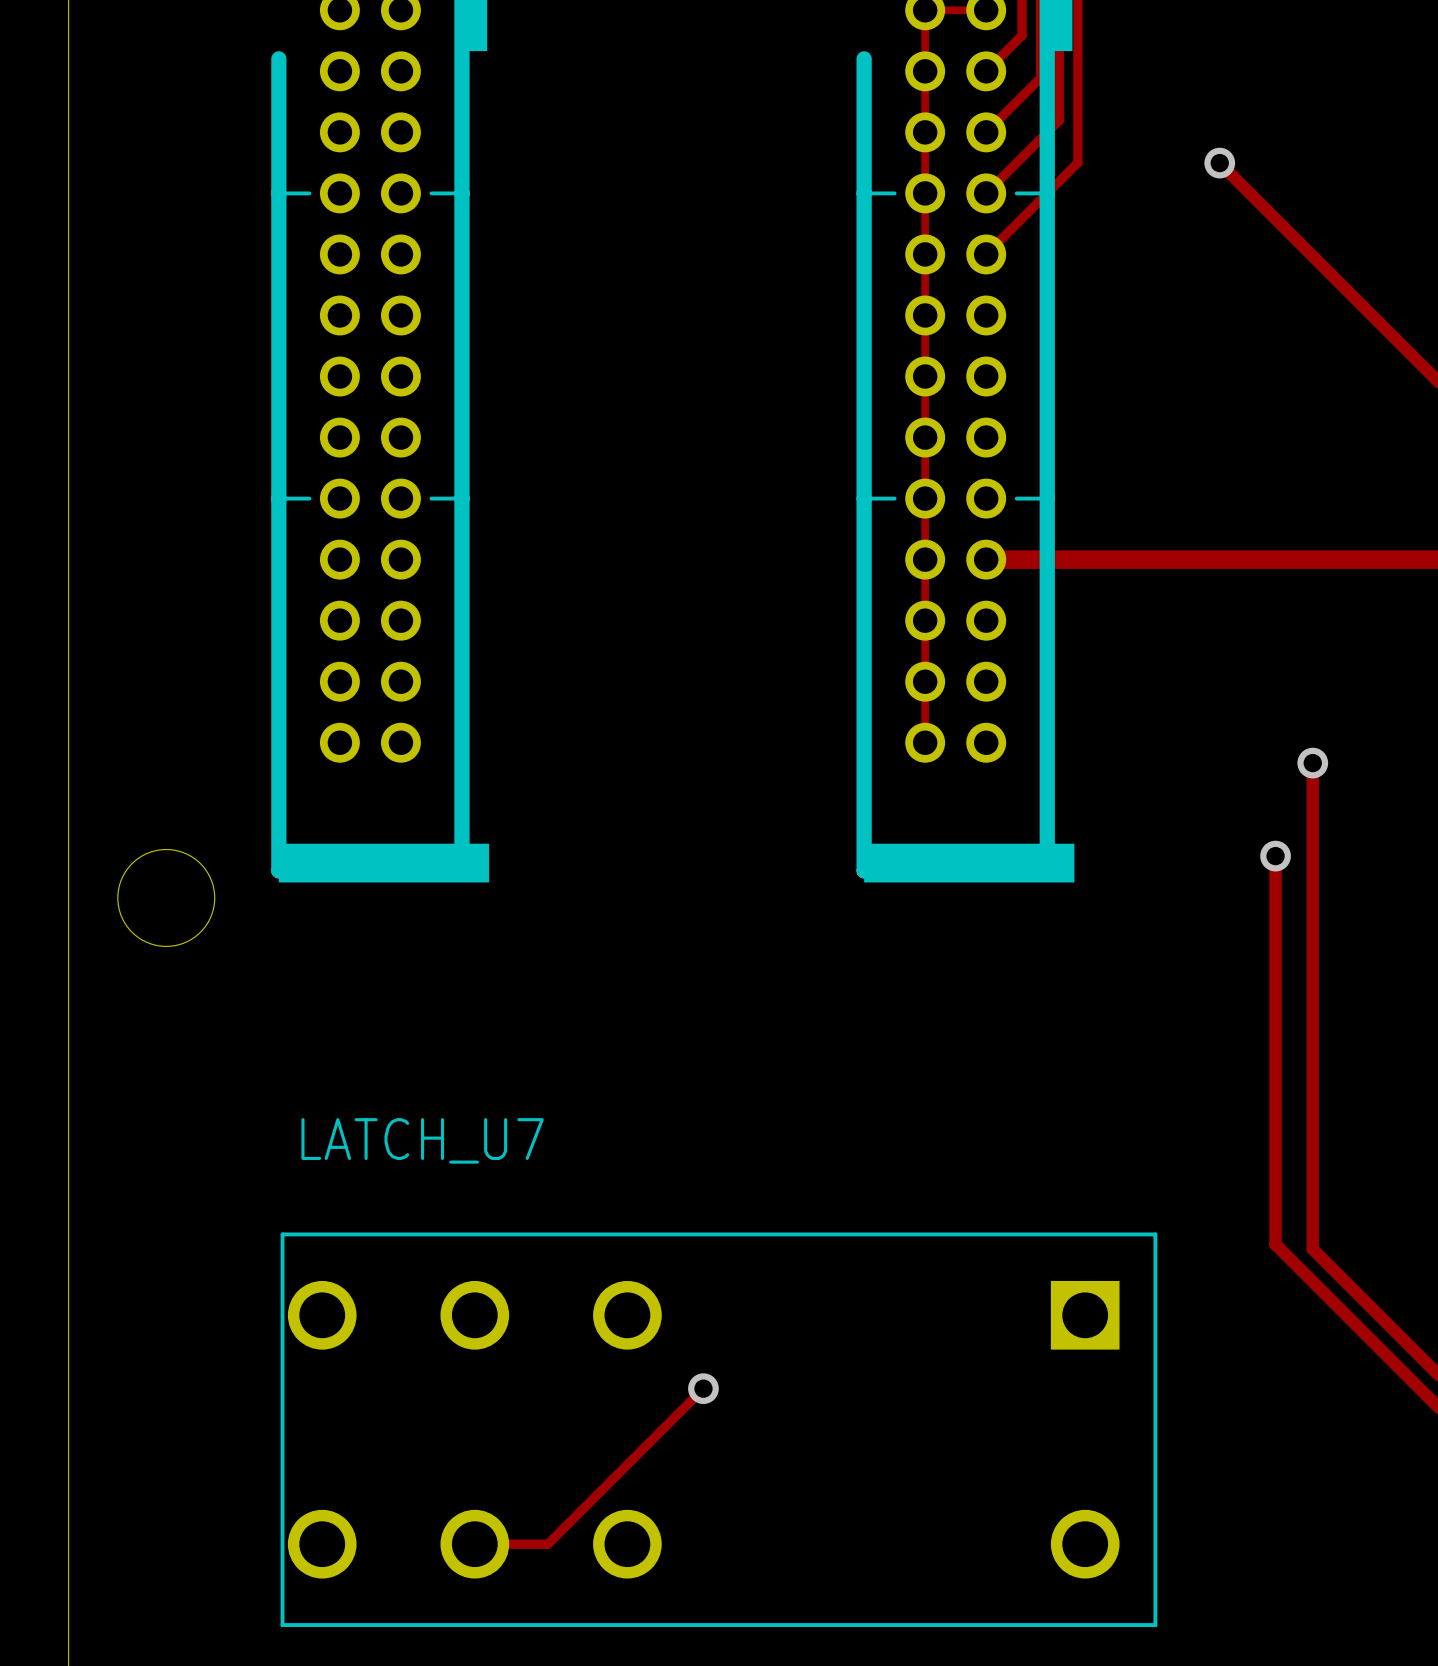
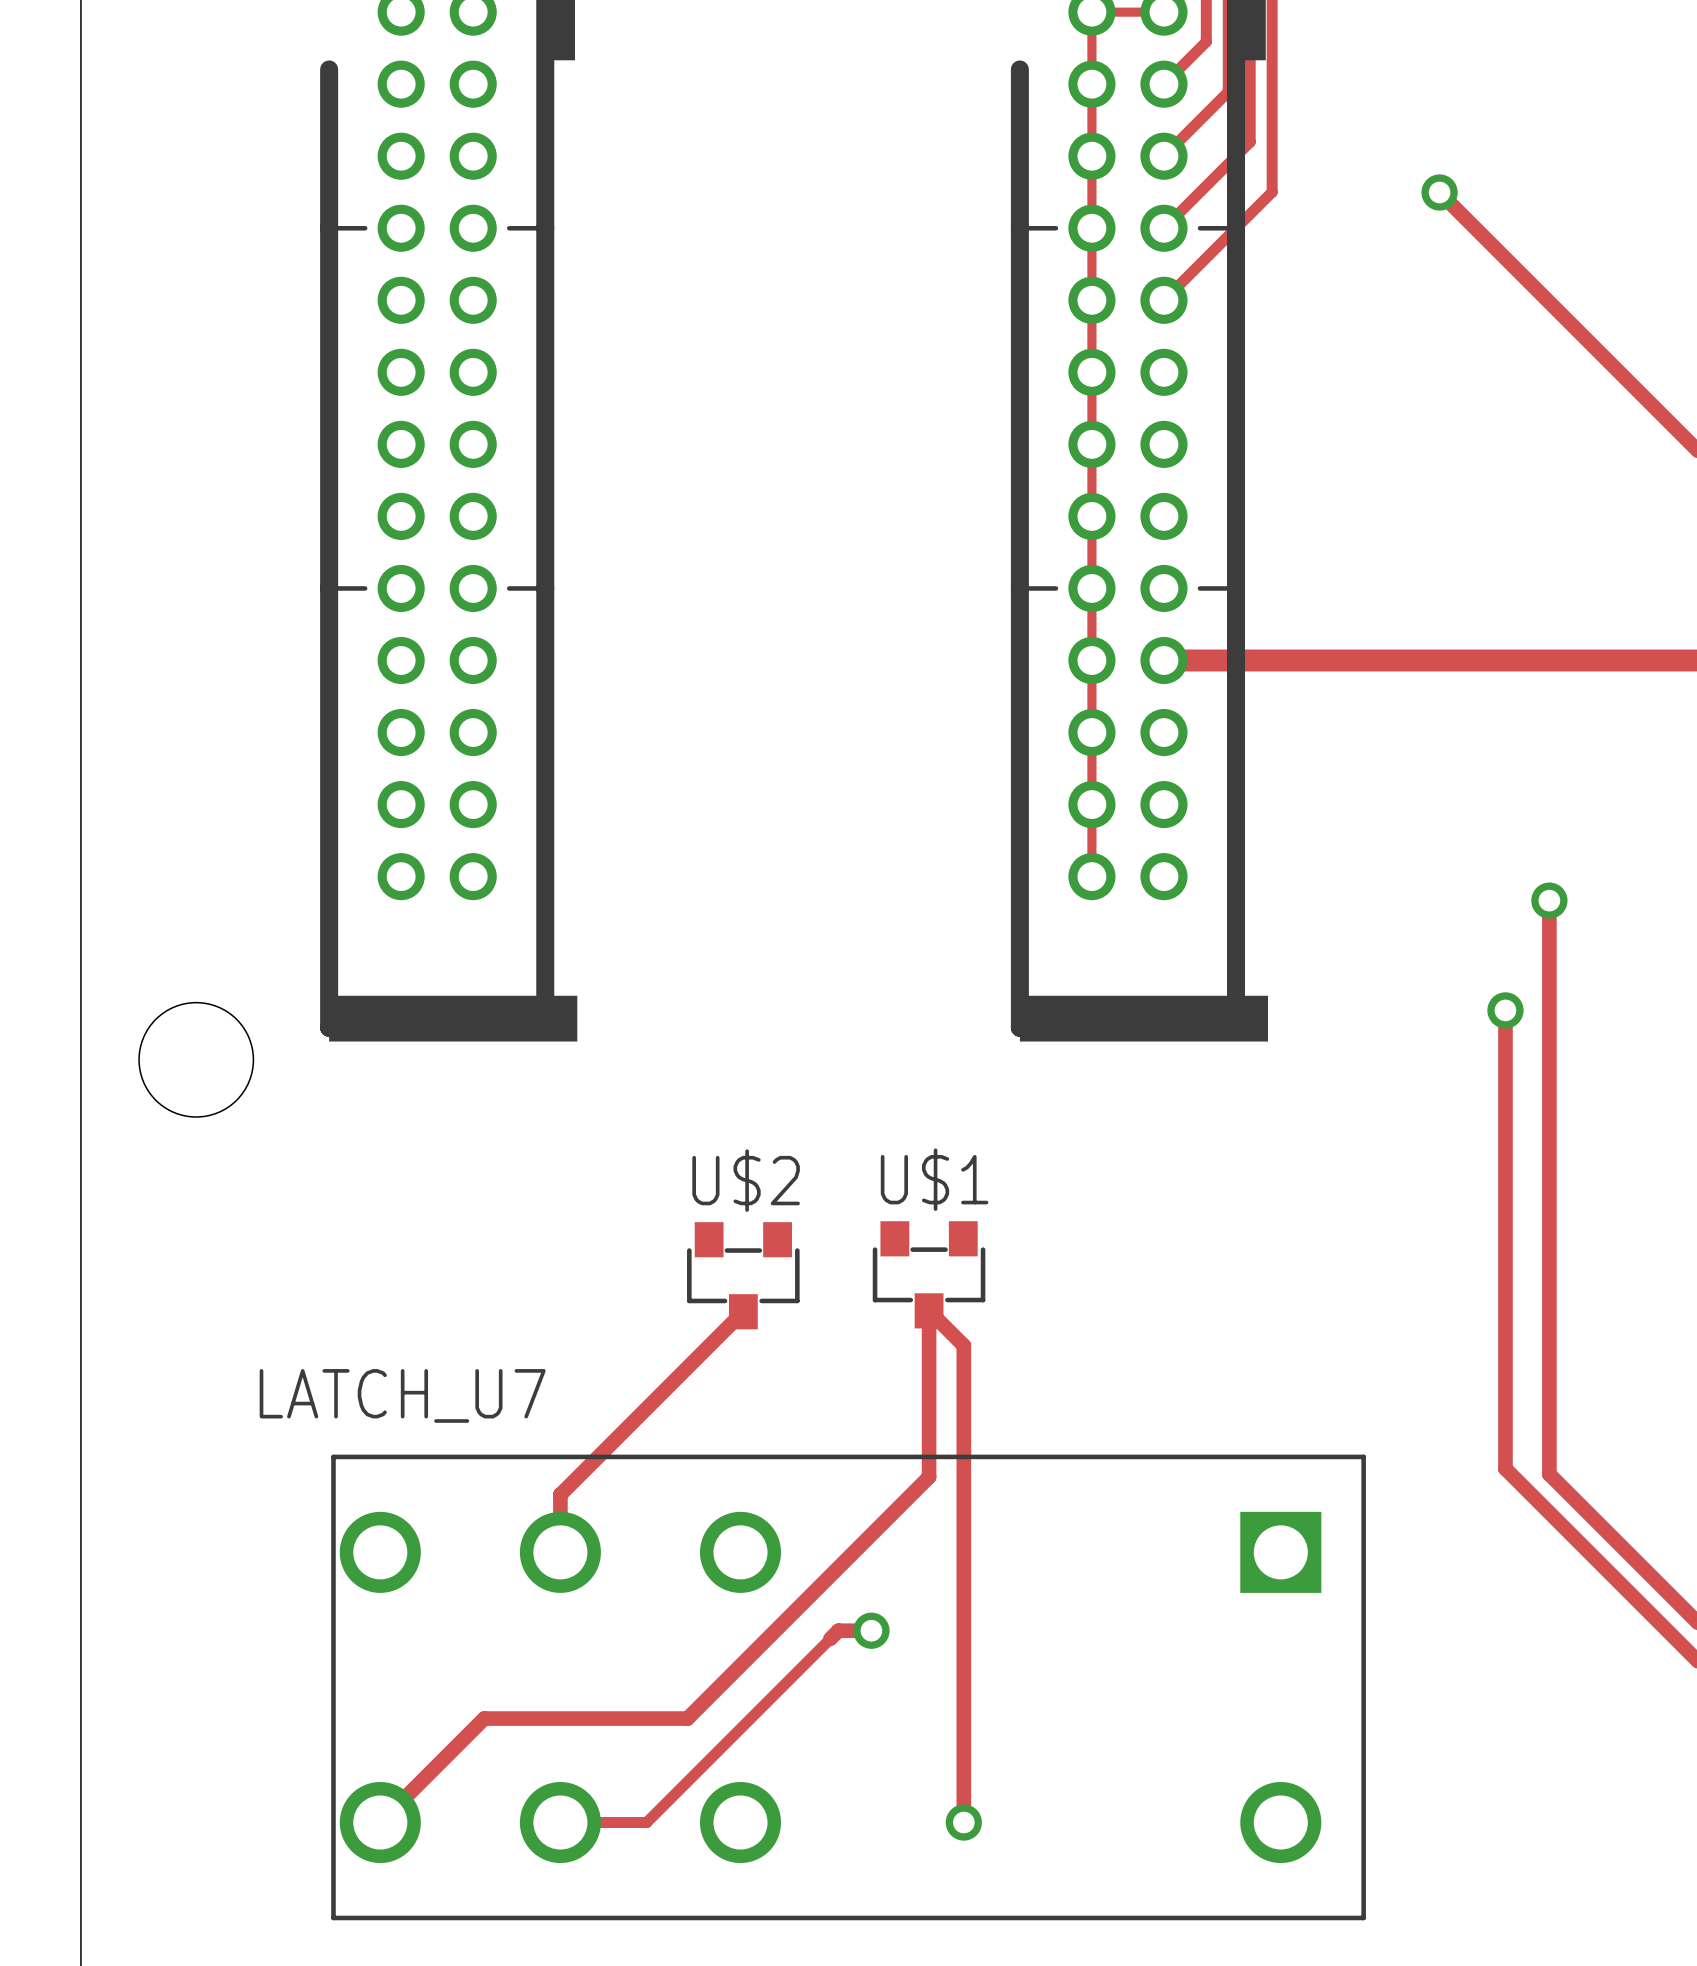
U$2: none -> (743, 1275)
U$1: none -> (929, 1274)
track: none -> (743, 1311) (560, 1494) (560, 1552)
LATCH_U7 name position: LATCH_U7 (422, 1140) -> LATCH_U7 (402, 1395)
track: none -> (871, 1630) (838, 1630) (830, 1638)
via position: (703, 1388) -> (871, 1630)
track: none -> (380, 1822) (484, 1718) (687, 1718) (929, 1477) (929, 1310) (963, 1345) (963, 1822)
via: none -> (963, 1822)

